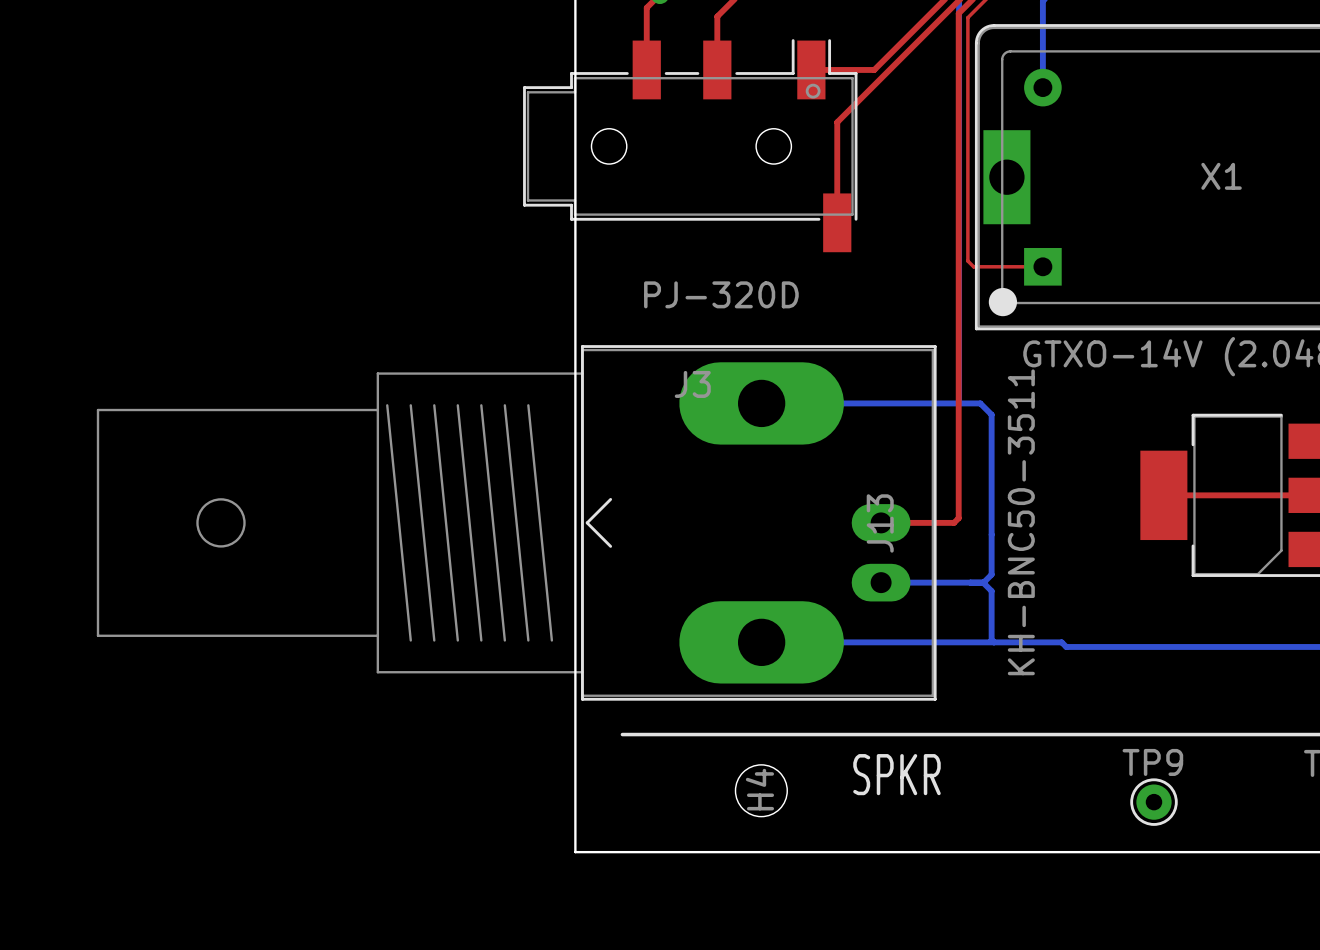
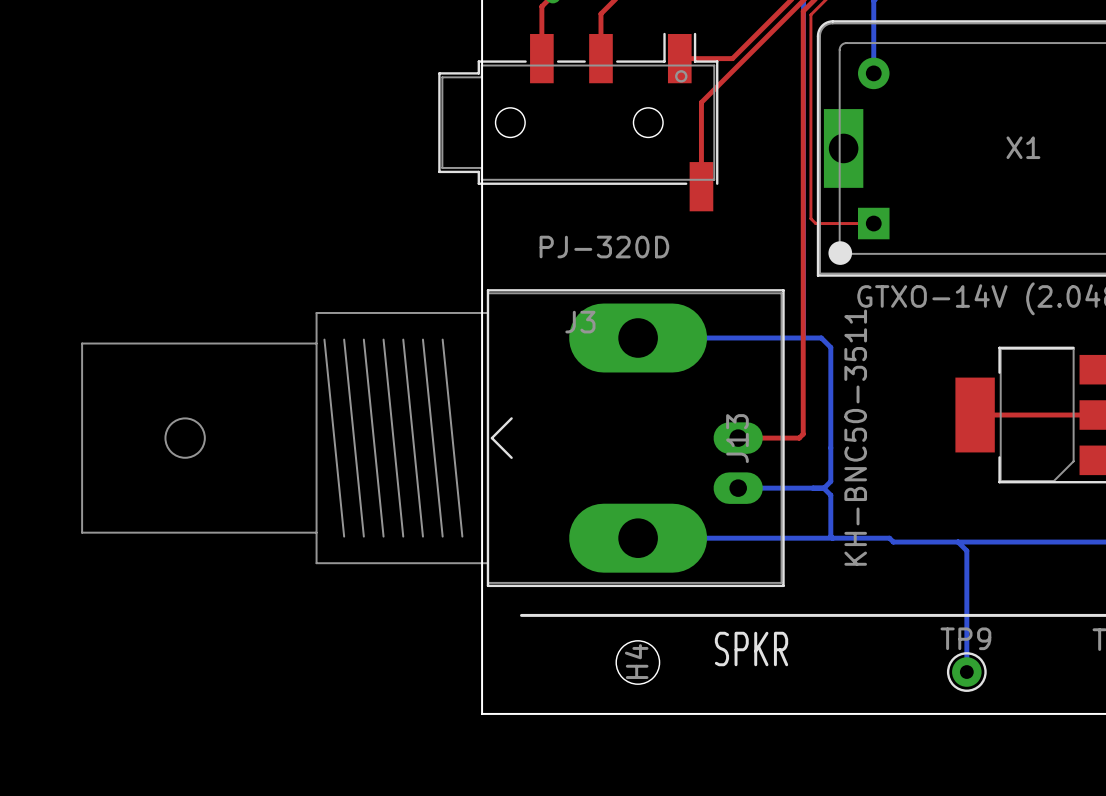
bottom track: none -> (958, 542) (966, 550) (966, 672)

